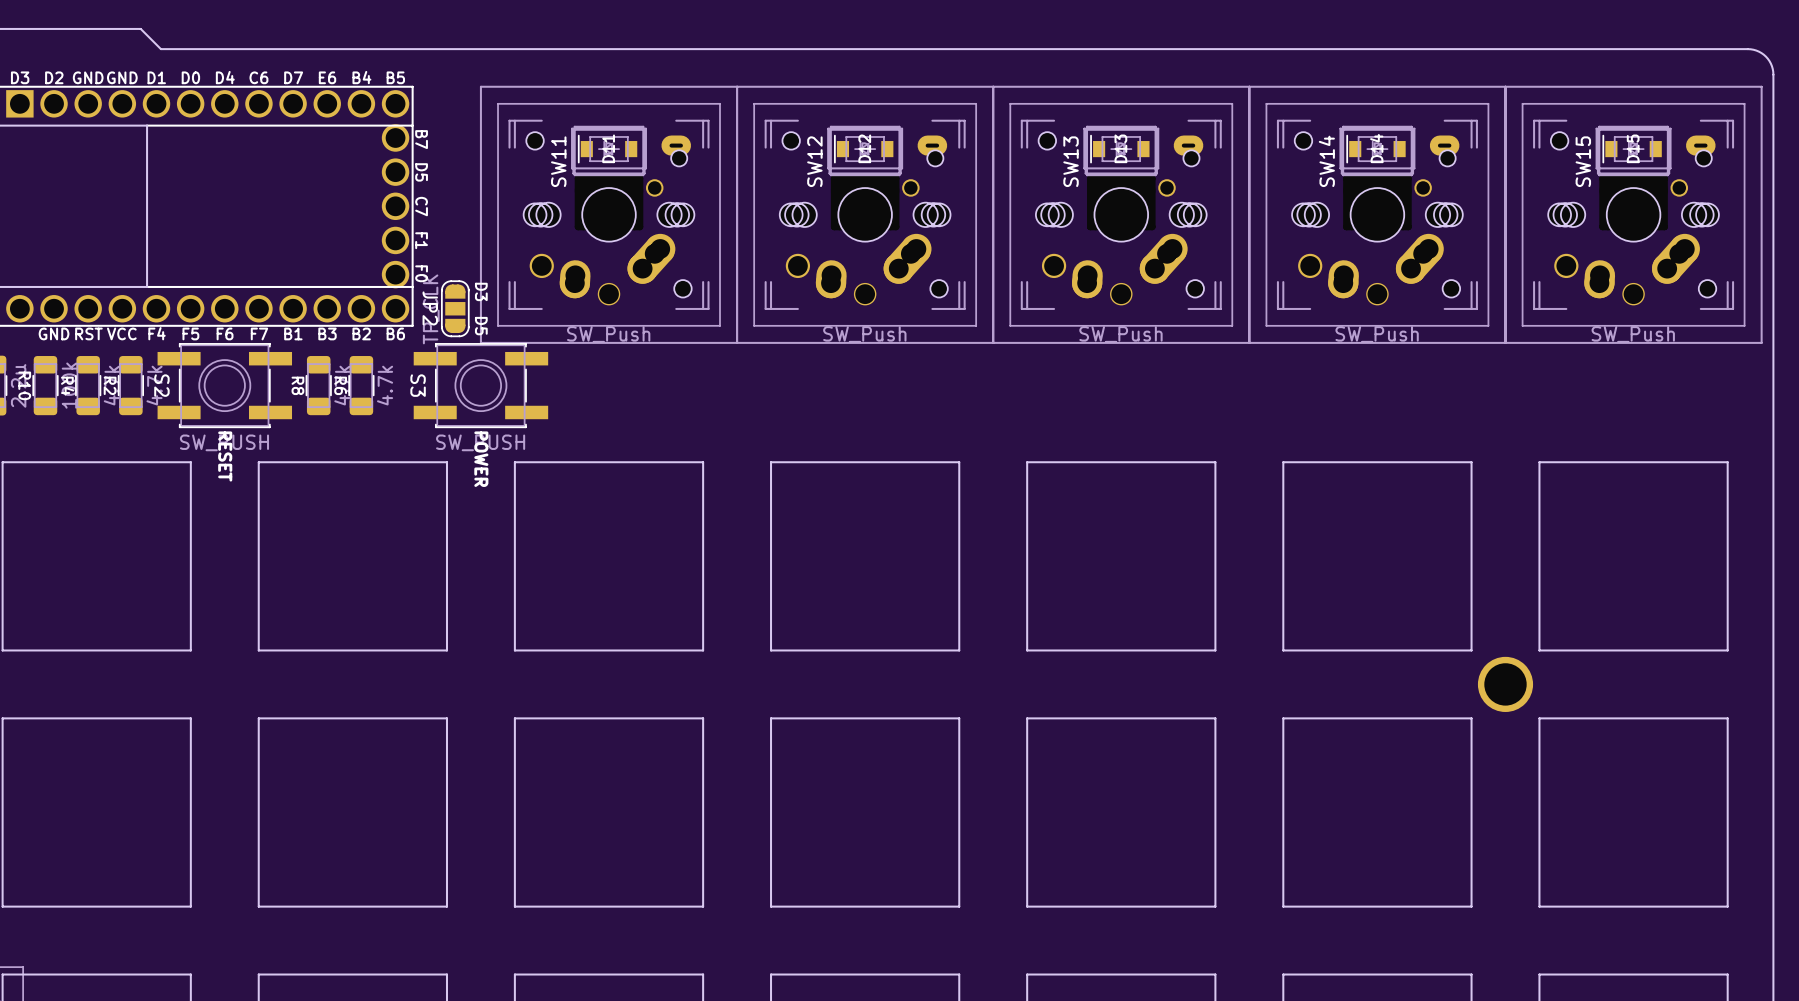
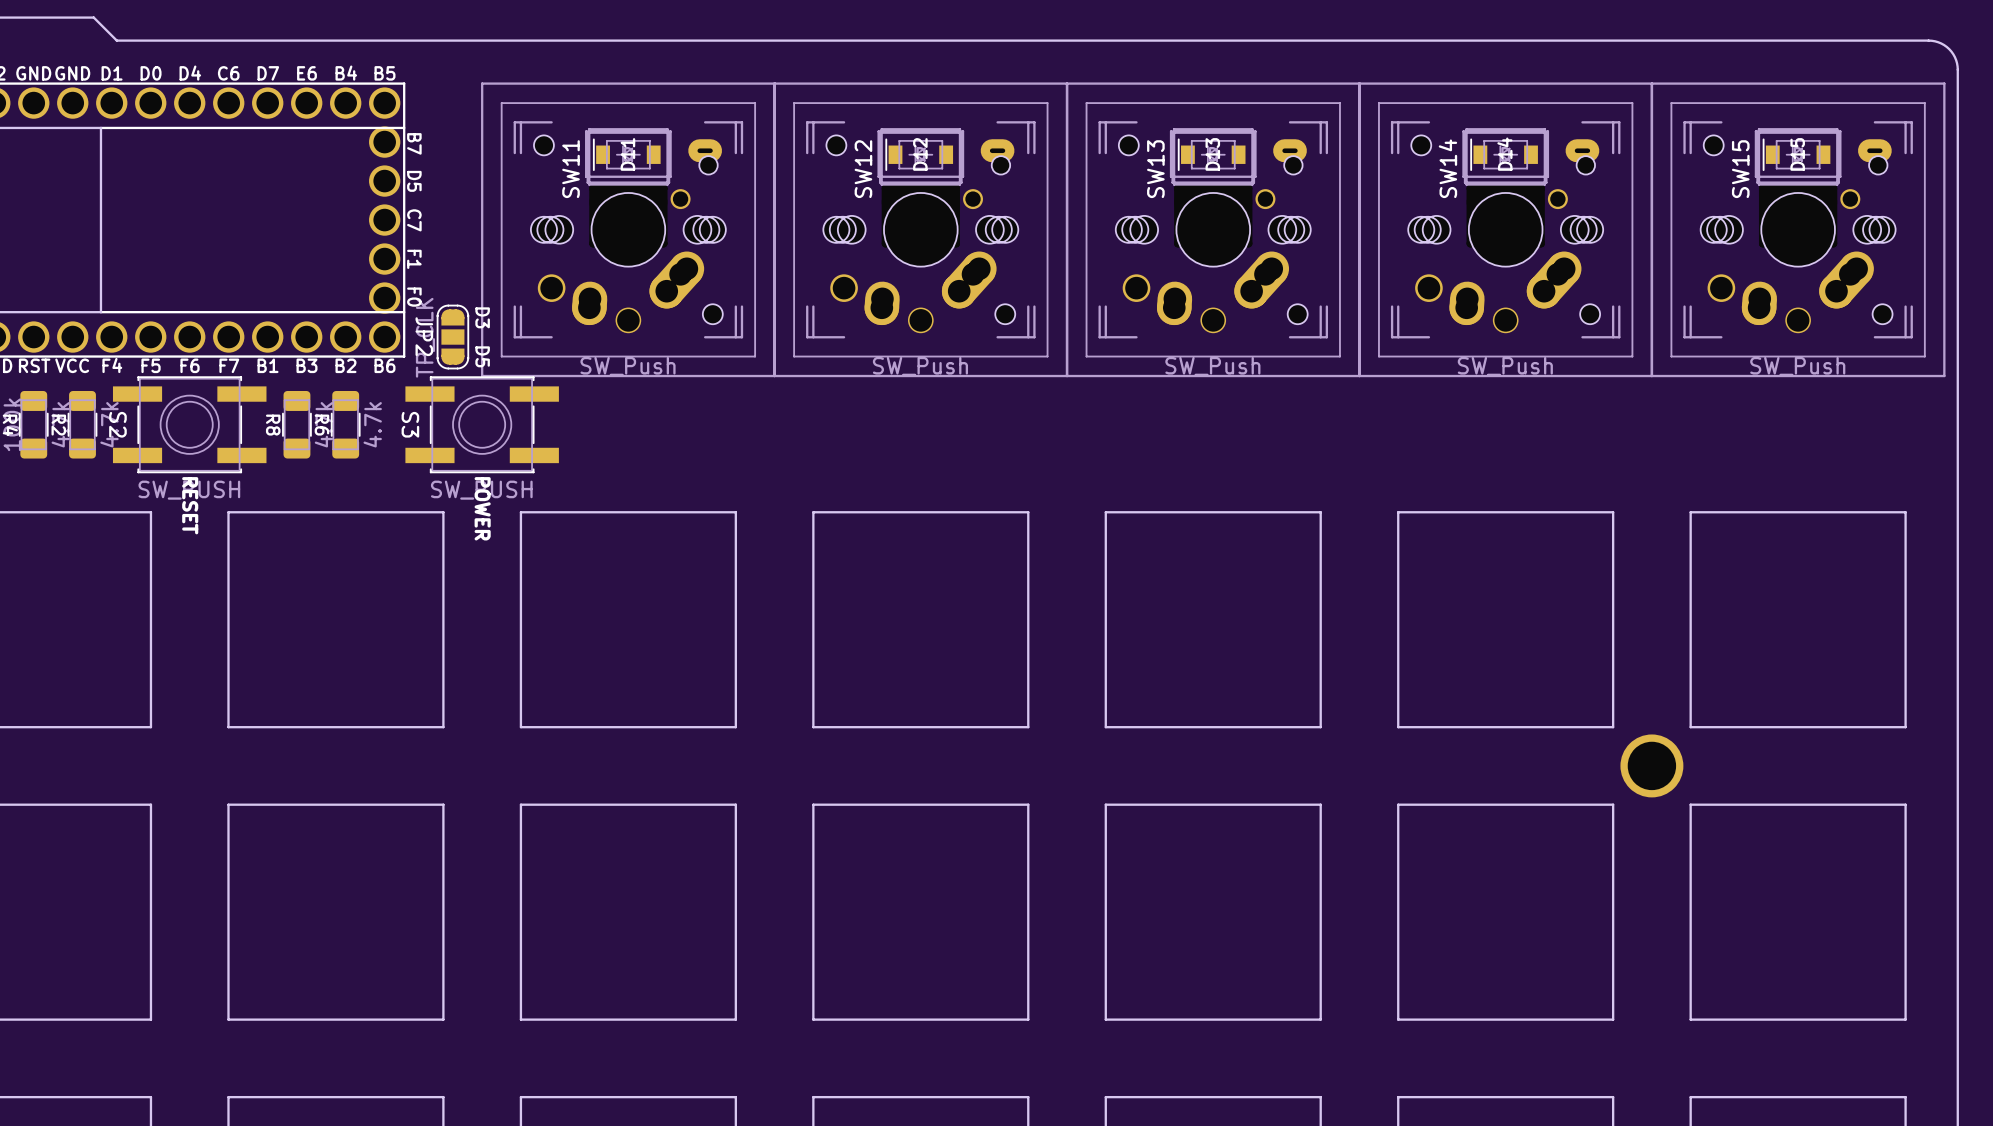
SW11 footprint: [479, 85, 739, 344] -> [481, 82, 776, 378]
SW12 footprint: [736, 85, 995, 344] -> [773, 82, 1069, 378]
SW13 footprint: [992, 85, 1251, 344] -> [1065, 82, 1361, 378]
SW14 footprint: [1248, 85, 1507, 344] -> [1358, 82, 1654, 378]
SW15 footprint: [1504, 85, 1763, 344] -> [1650, 82, 1946, 378]

